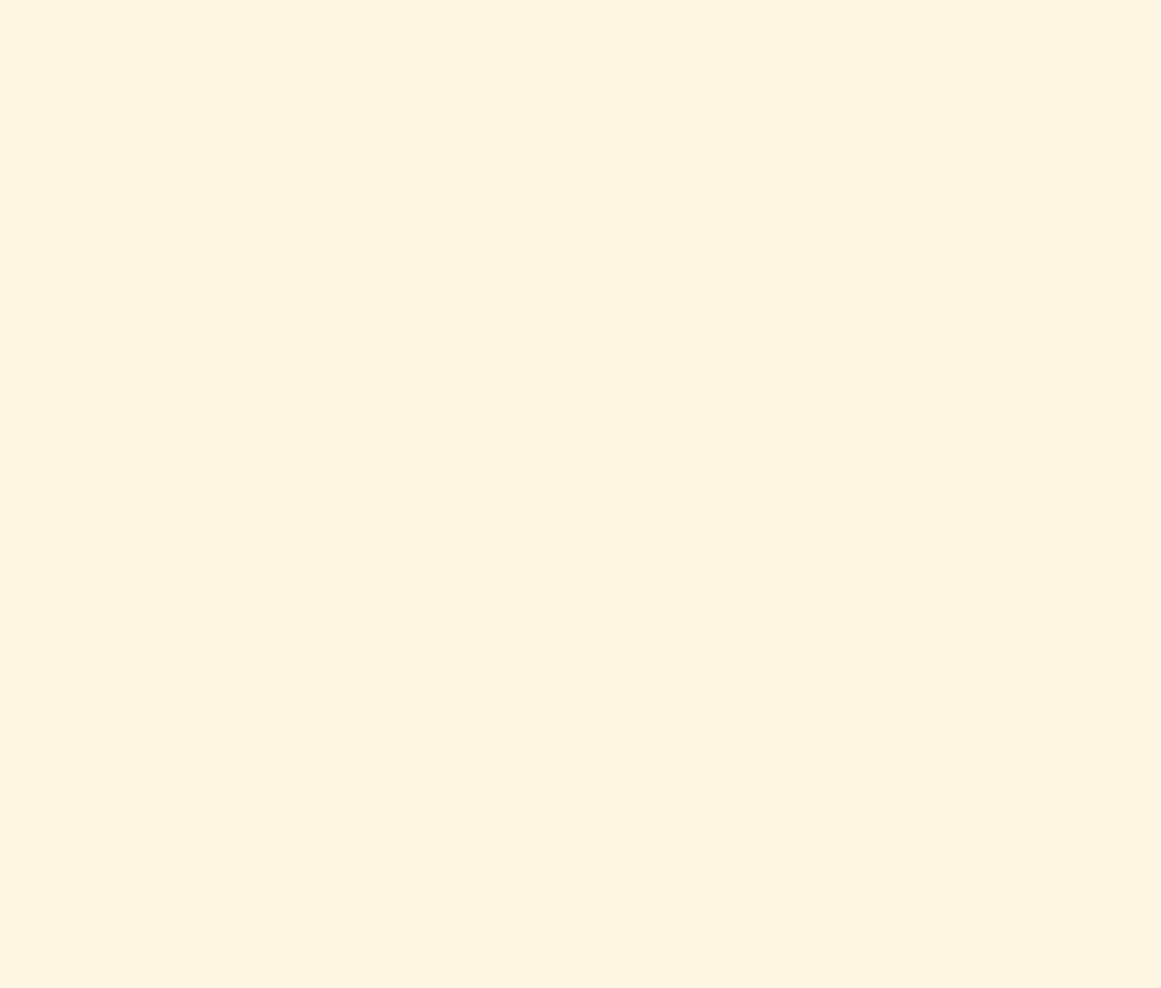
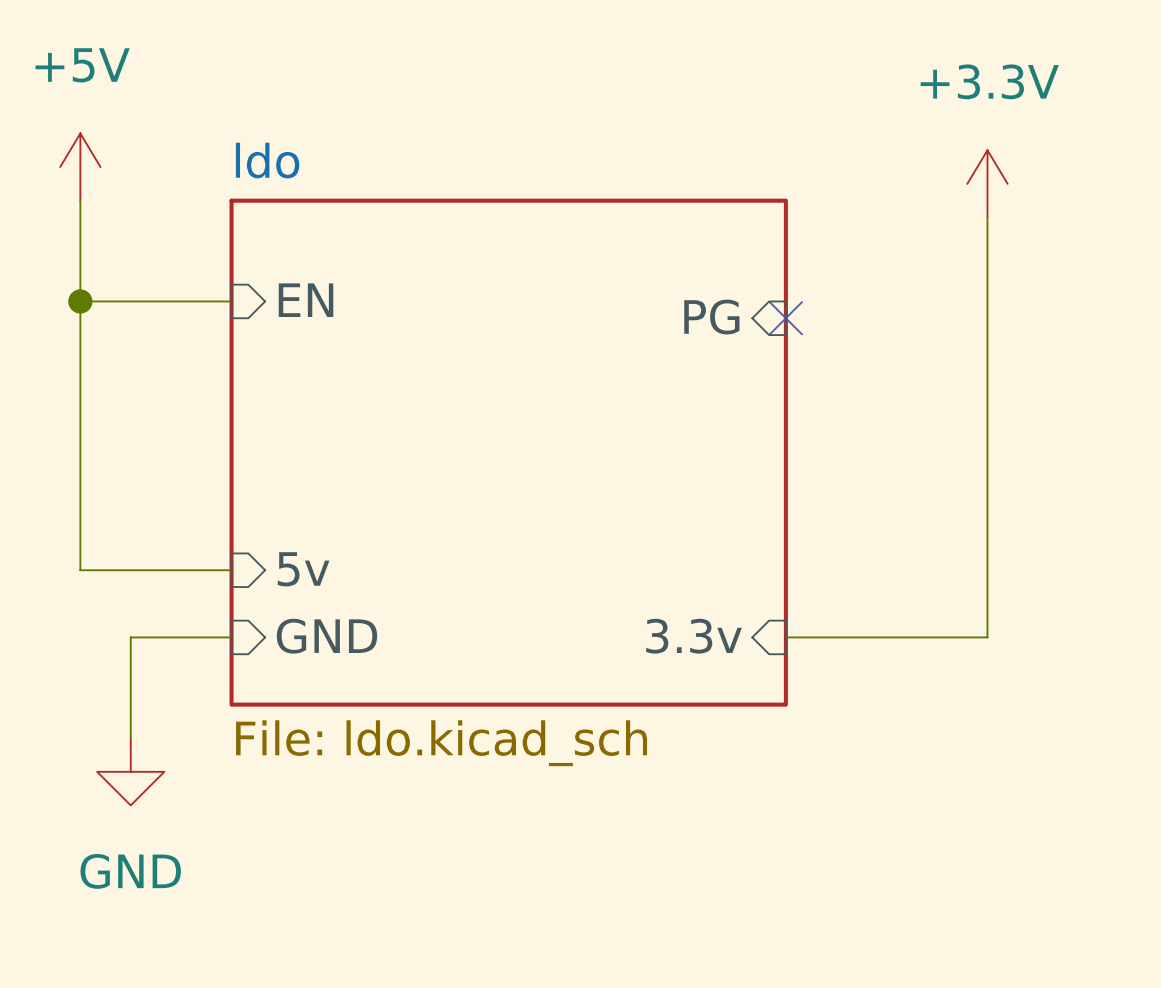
power symbol: none -> +5V (80, 167)
power symbol: none -> +3.3V (987, 183)
wire: none -> (80, 200) (80, 570) (231, 570)
wire: none -> (987, 217) (987, 637) (785, 637)
sheet pin: none -> EN (306, 300)
wire: none -> (80, 301) (231, 301)
junction: none -> (80, 301)
sheet pin: none -> PG (711, 317)
no-connect mark: none -> (785, 318)
sheet ldo: none -> File: ldo.kicad_sch (508, 452)
sheet pin: none -> 5v (303, 569)
sheet pin: none -> GND (326, 636)
sheet pin: none -> 3.3v (694, 636)
wire: none -> (231, 637) (130, 637) (130, 738)
power symbol: none -> GND (130, 771)

